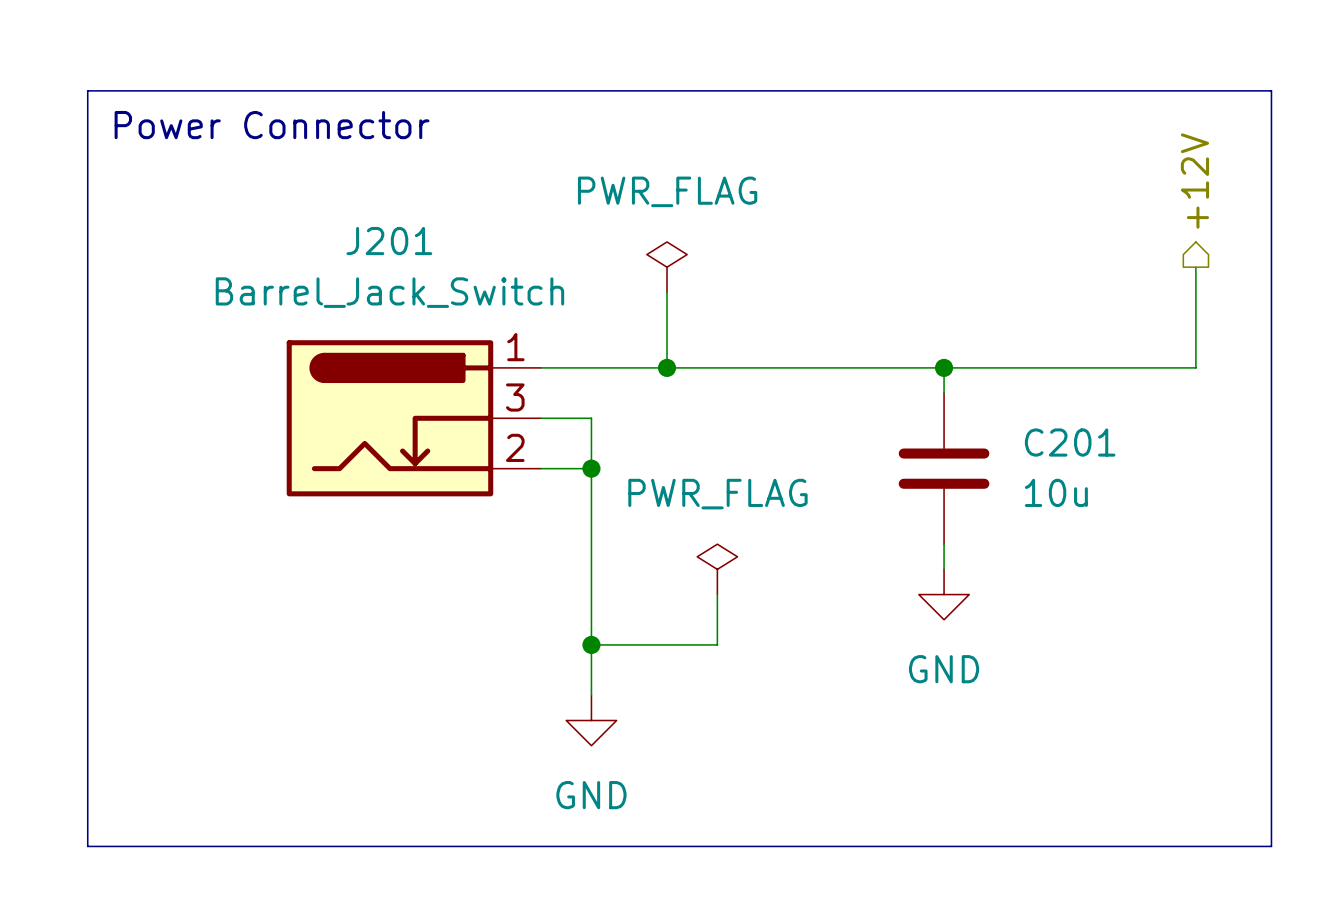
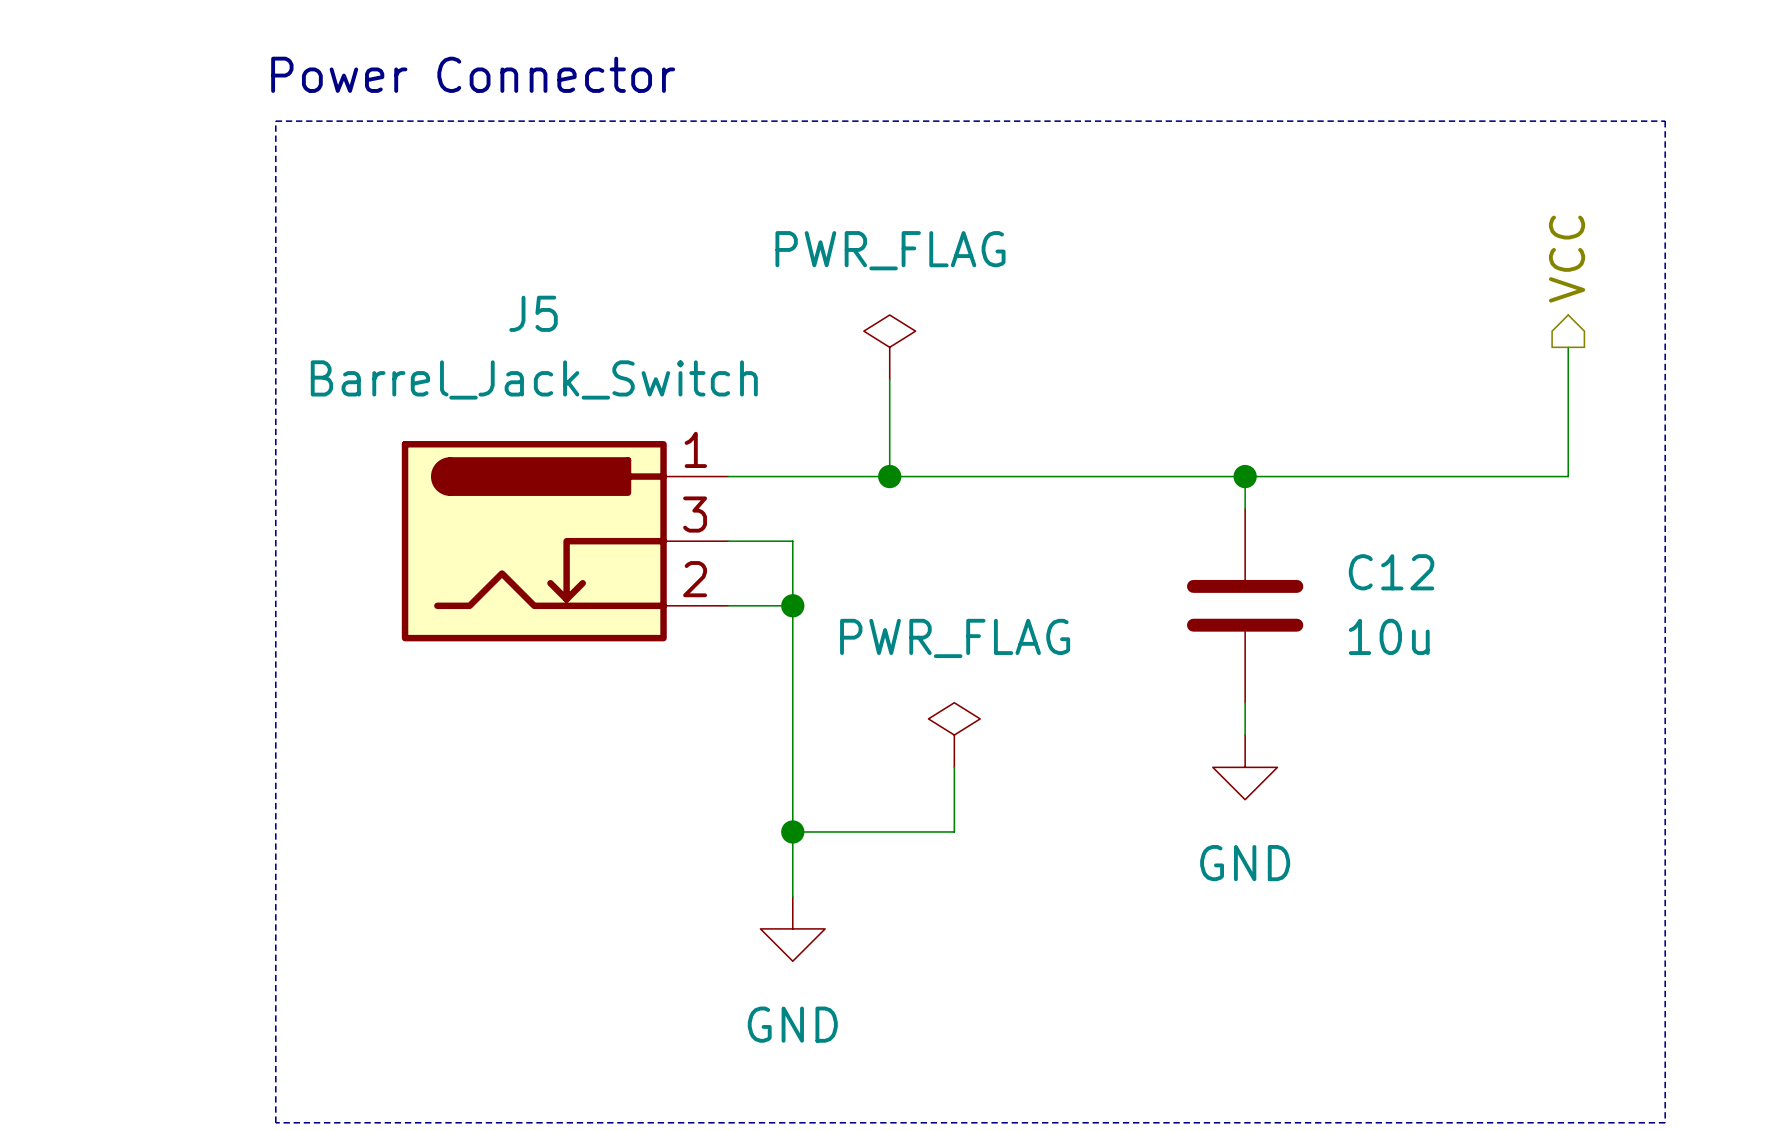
line: (87, 90) (1271, 90) (1271, 846) (87, 846) (87, 90) -> (275, 121) (275, 1122) (1665, 1122) (1665, 121) (275, 121)
text position: Power Connector (272, 125) -> Power Connector (473, 74)
hierarchical label: +12V (1194, 181) -> VCC (1567, 259)
J201 name: J201 (389, 241) -> J5 (533, 313)
C201 name: C201 (1070, 442) -> C12 (1391, 572)

